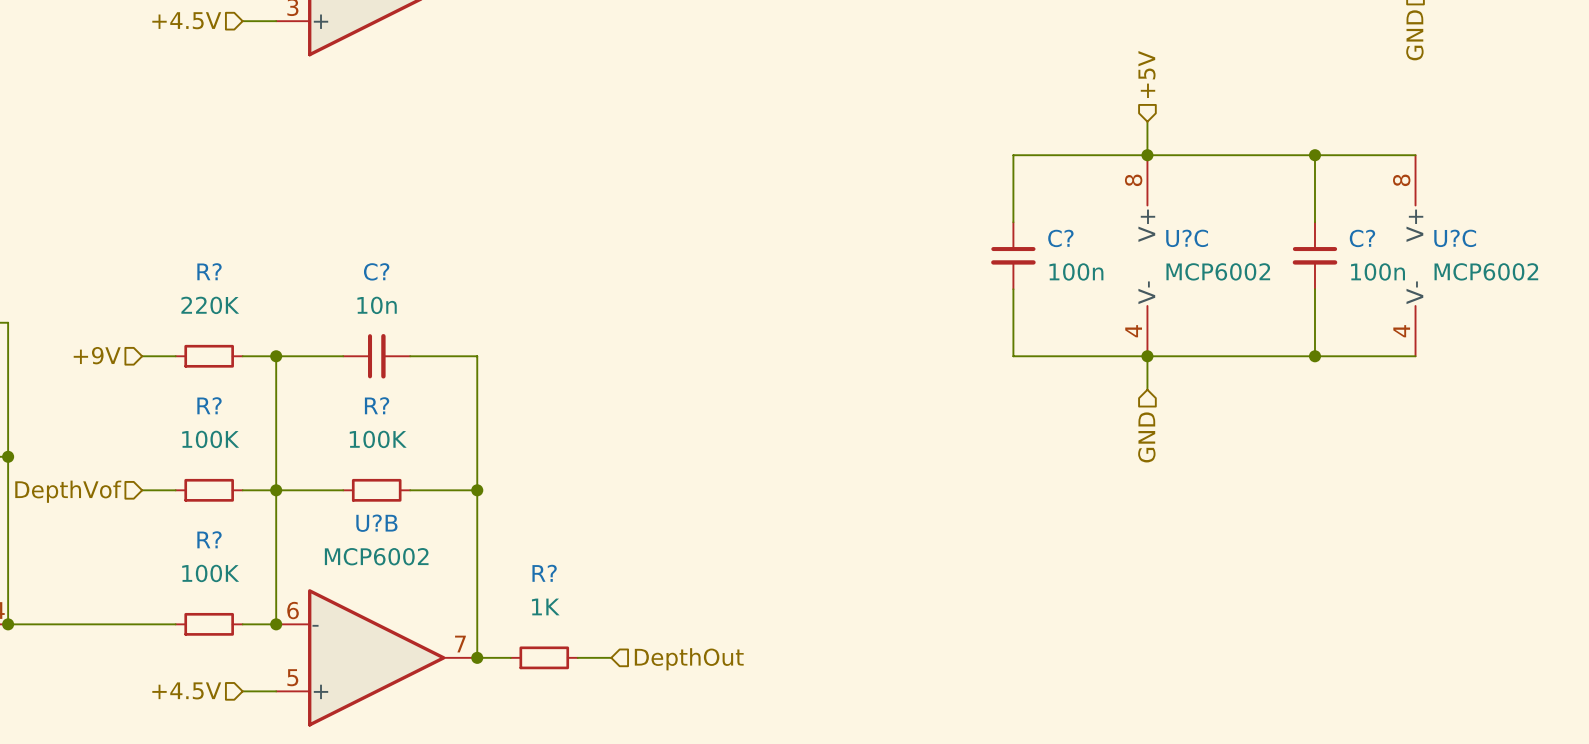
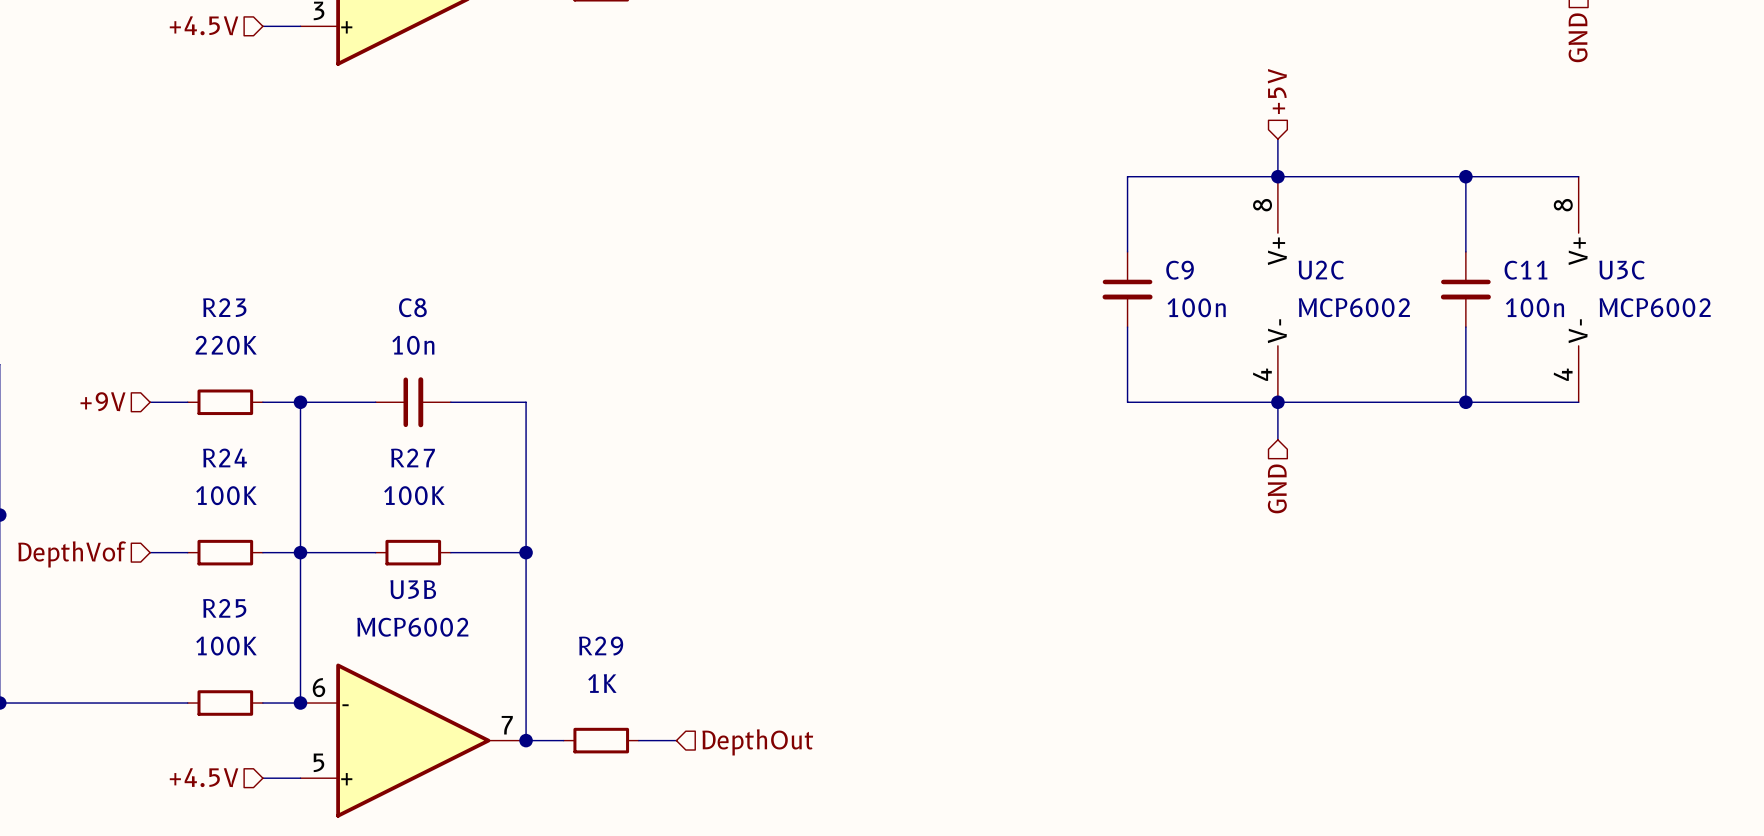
C? name: C? (1060, 238) -> C9 (1180, 270)
U?C name: U?C (1187, 238) -> U2C (1321, 270)
C? name: C? (1362, 238) -> C11 (1525, 270)
U?C name: U?C (1455, 238) -> U3C (1622, 270)
R? name: R? (209, 271) -> R23 (224, 307)
C? name: C? (376, 271) -> C8 (412, 307)
R? name: R? (209, 405) -> R24 (225, 457)
R? name: R? (377, 405) -> R27 (413, 457)
U?B name: U?B (376, 523) -> U3B (413, 589)
R? name: R? (209, 539) -> R25 (224, 608)
R? name: R? (544, 573) -> R29 (601, 646)

